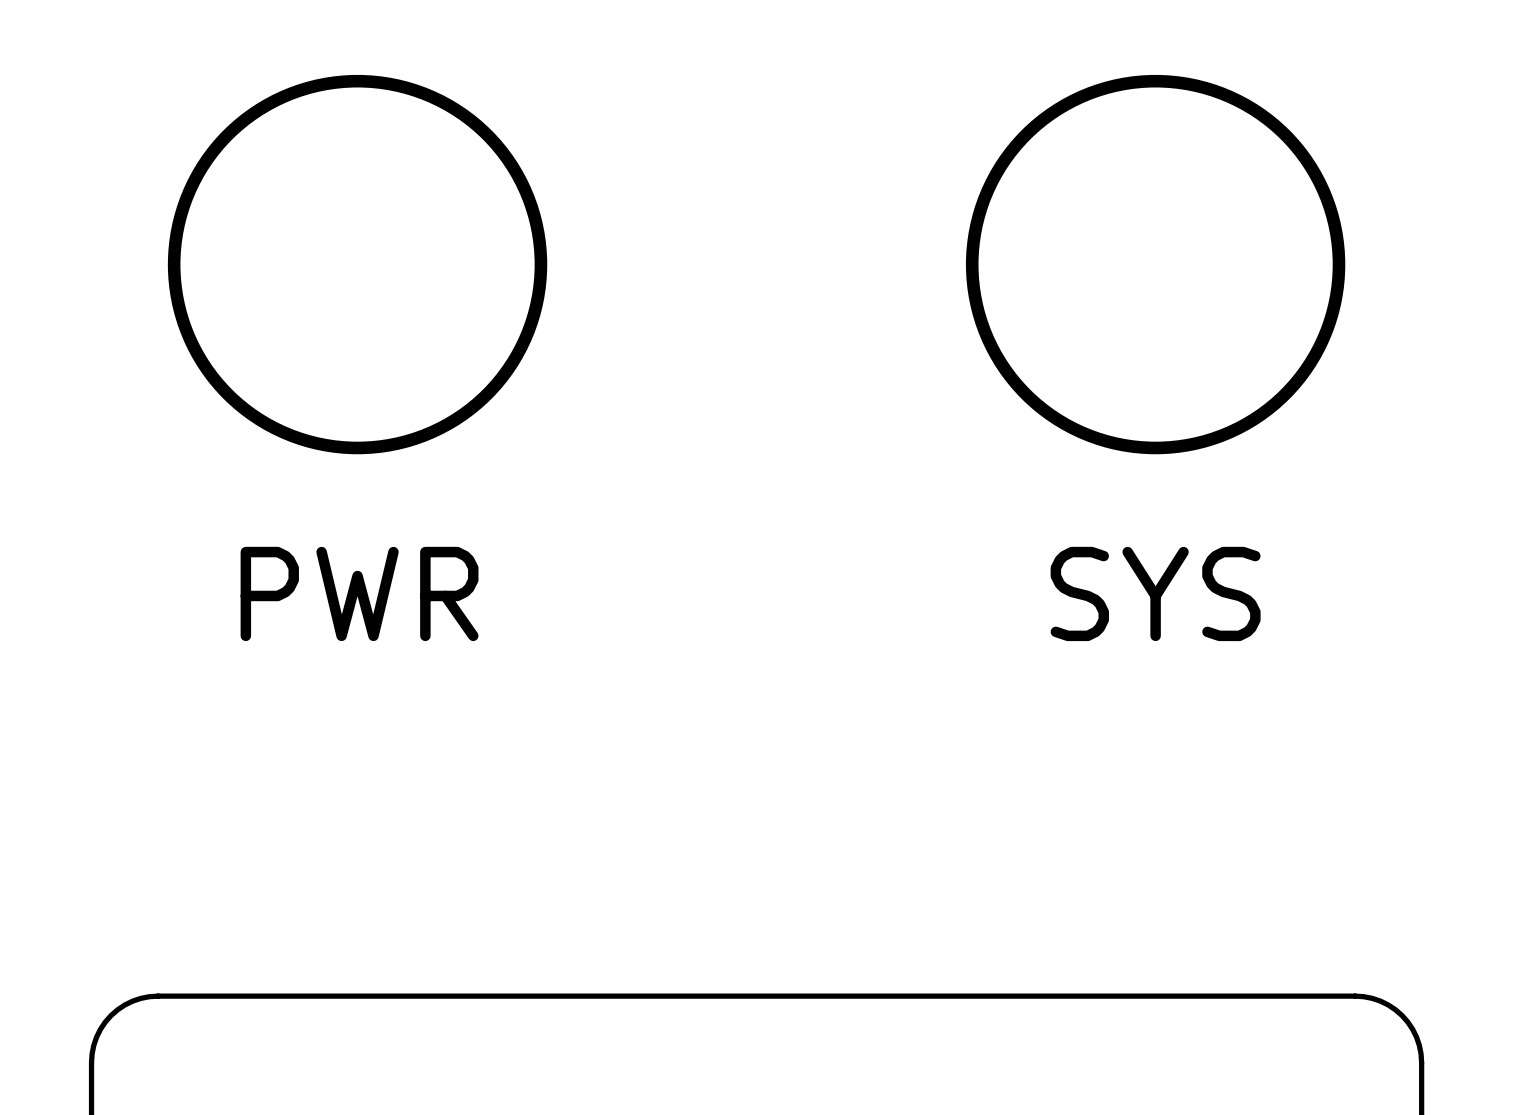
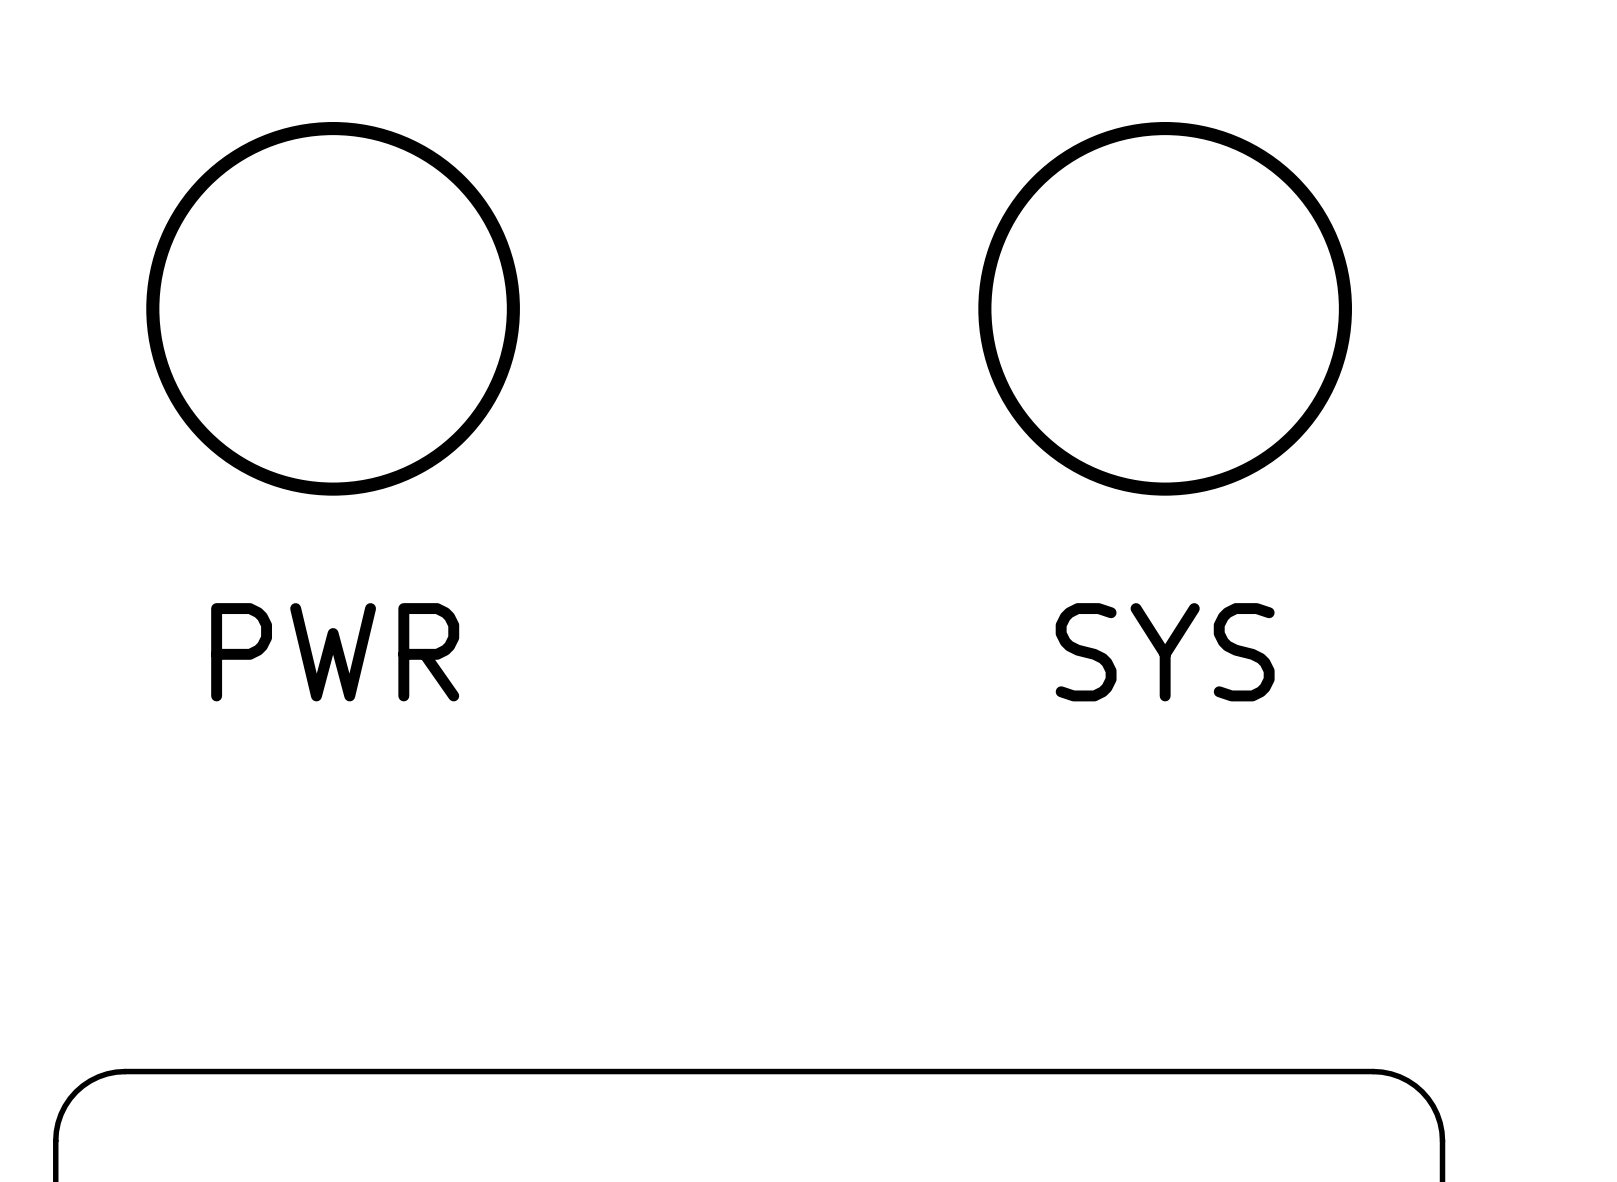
round board edge size: [167, 74, 548, 455] -> [146, 122, 520, 496]
round board edge size: [965, 74, 1346, 455] -> [978, 122, 1352, 496]

